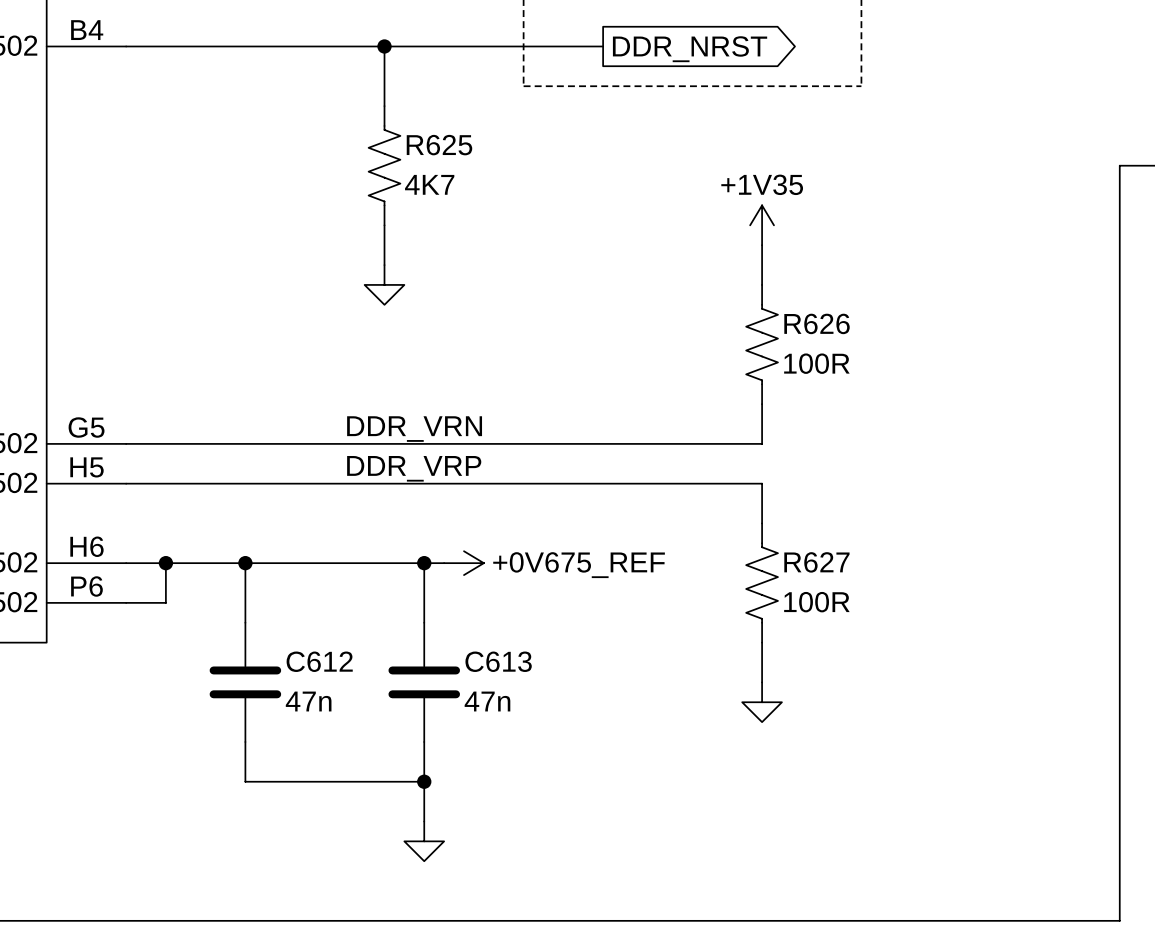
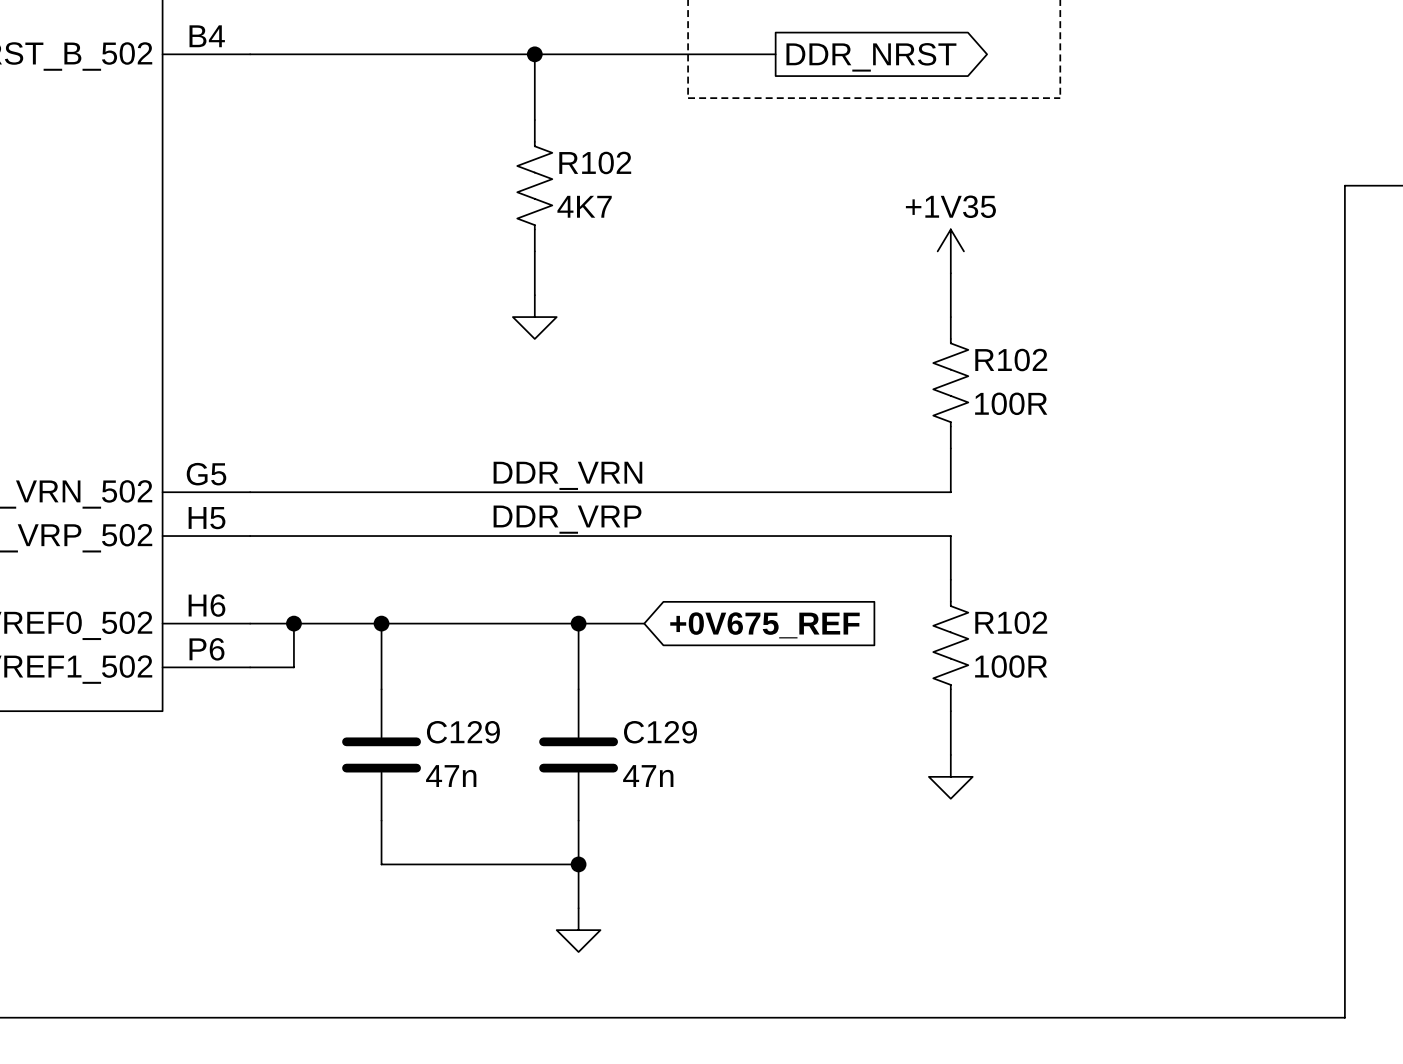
R625 name: R625 (439, 145) -> R102 (595, 162)
R626 name: R626 (817, 323) -> R102 (1011, 360)
R627 name: R627 (816, 562) -> R102 (1011, 622)
power symbol: +0V675_REF (463, 563) -> none
global label: none -> +0V675_REF (764, 625)
C612 name: C612 (319, 661) -> C129 (463, 732)
C613 name: C613 (498, 661) -> C129 (660, 732)

